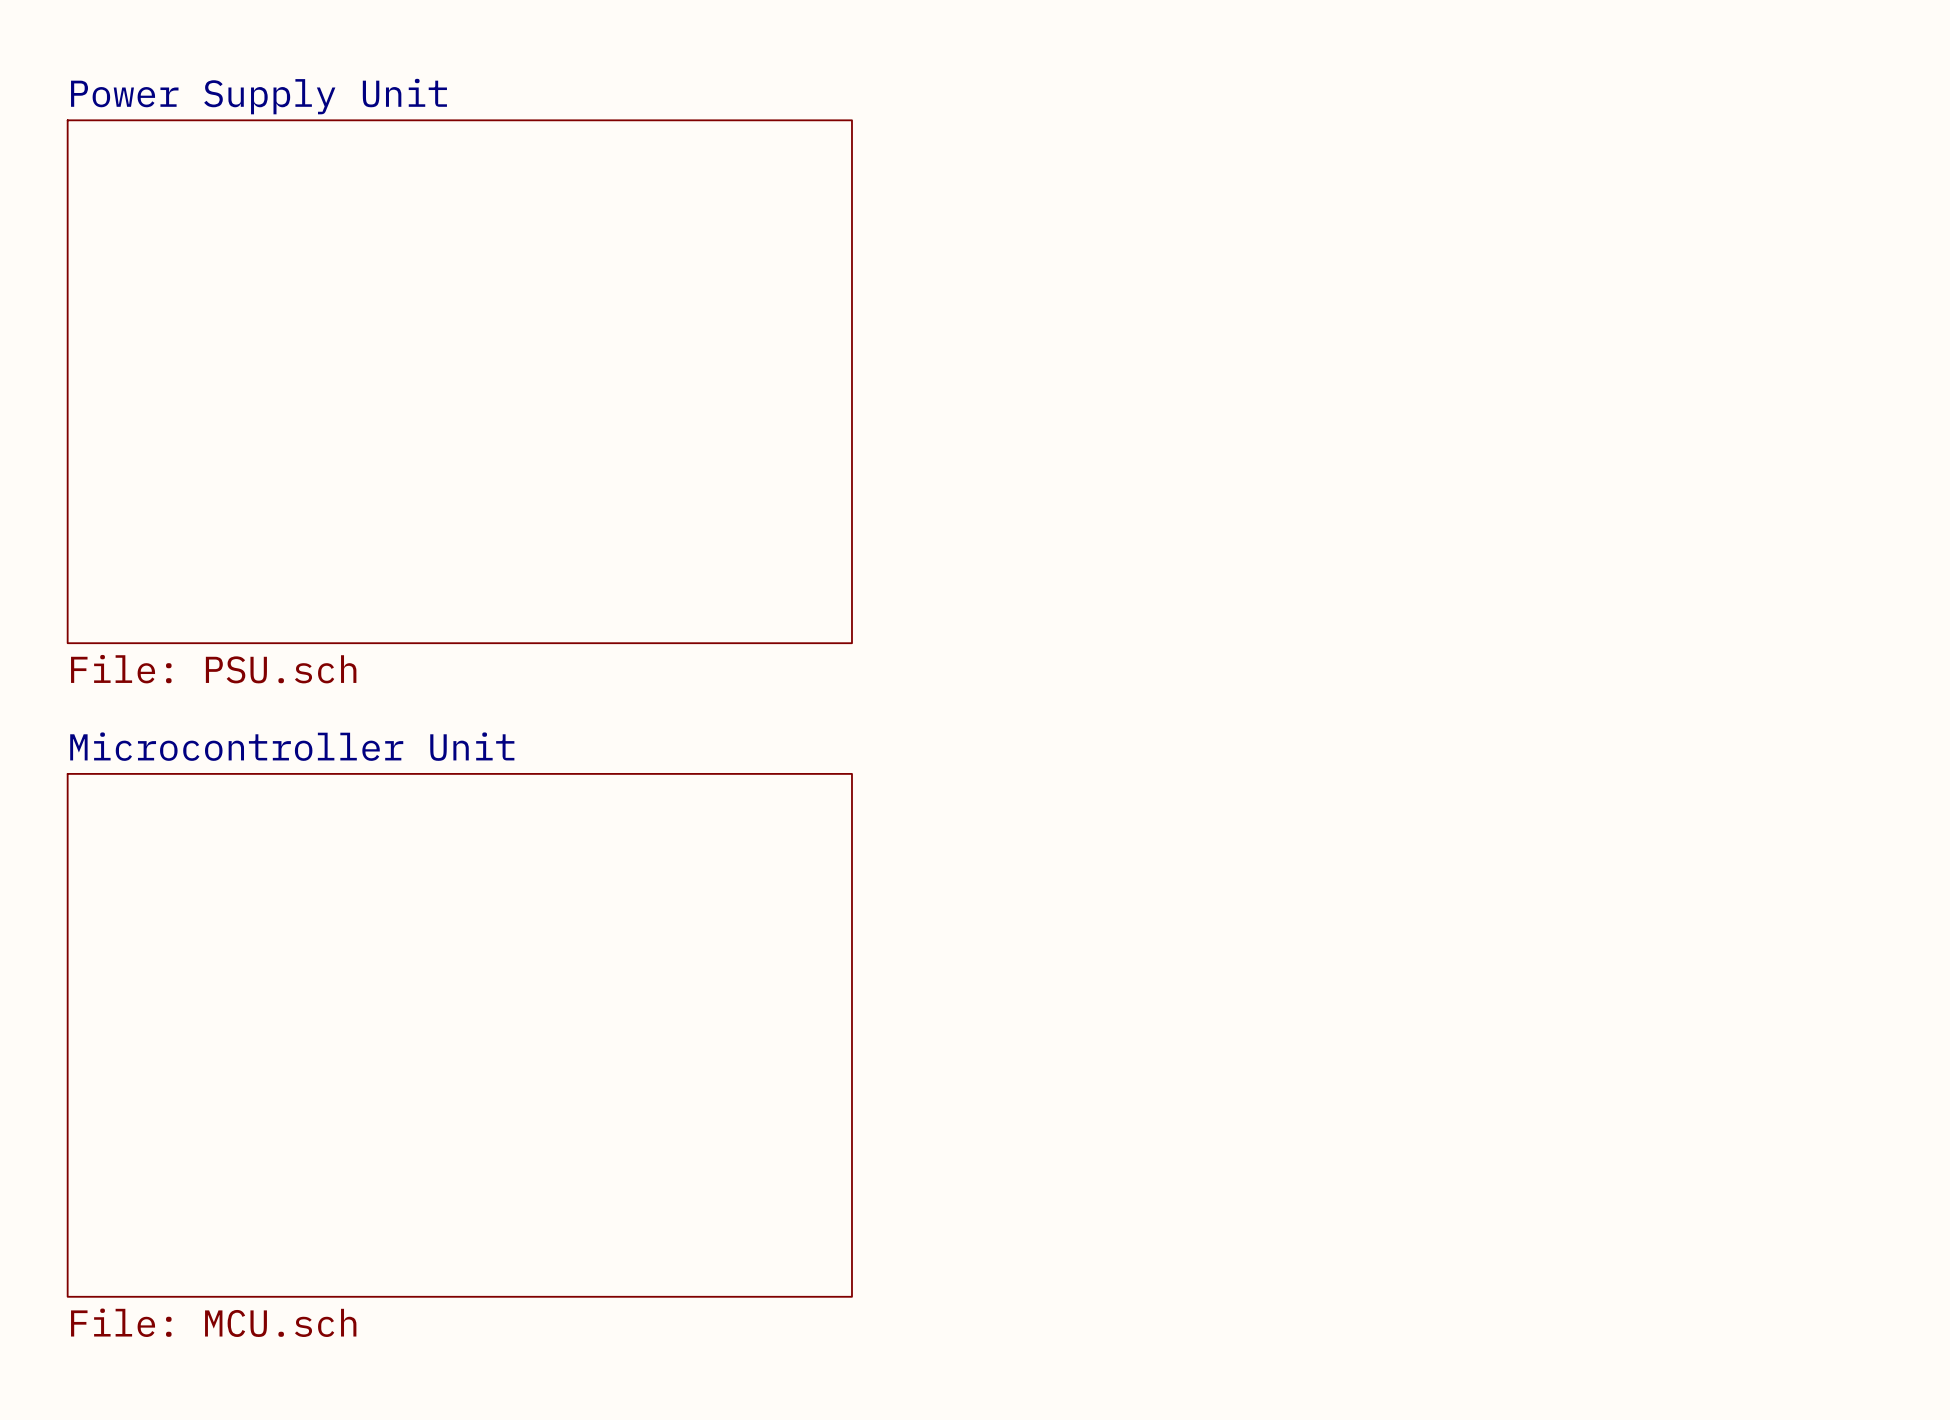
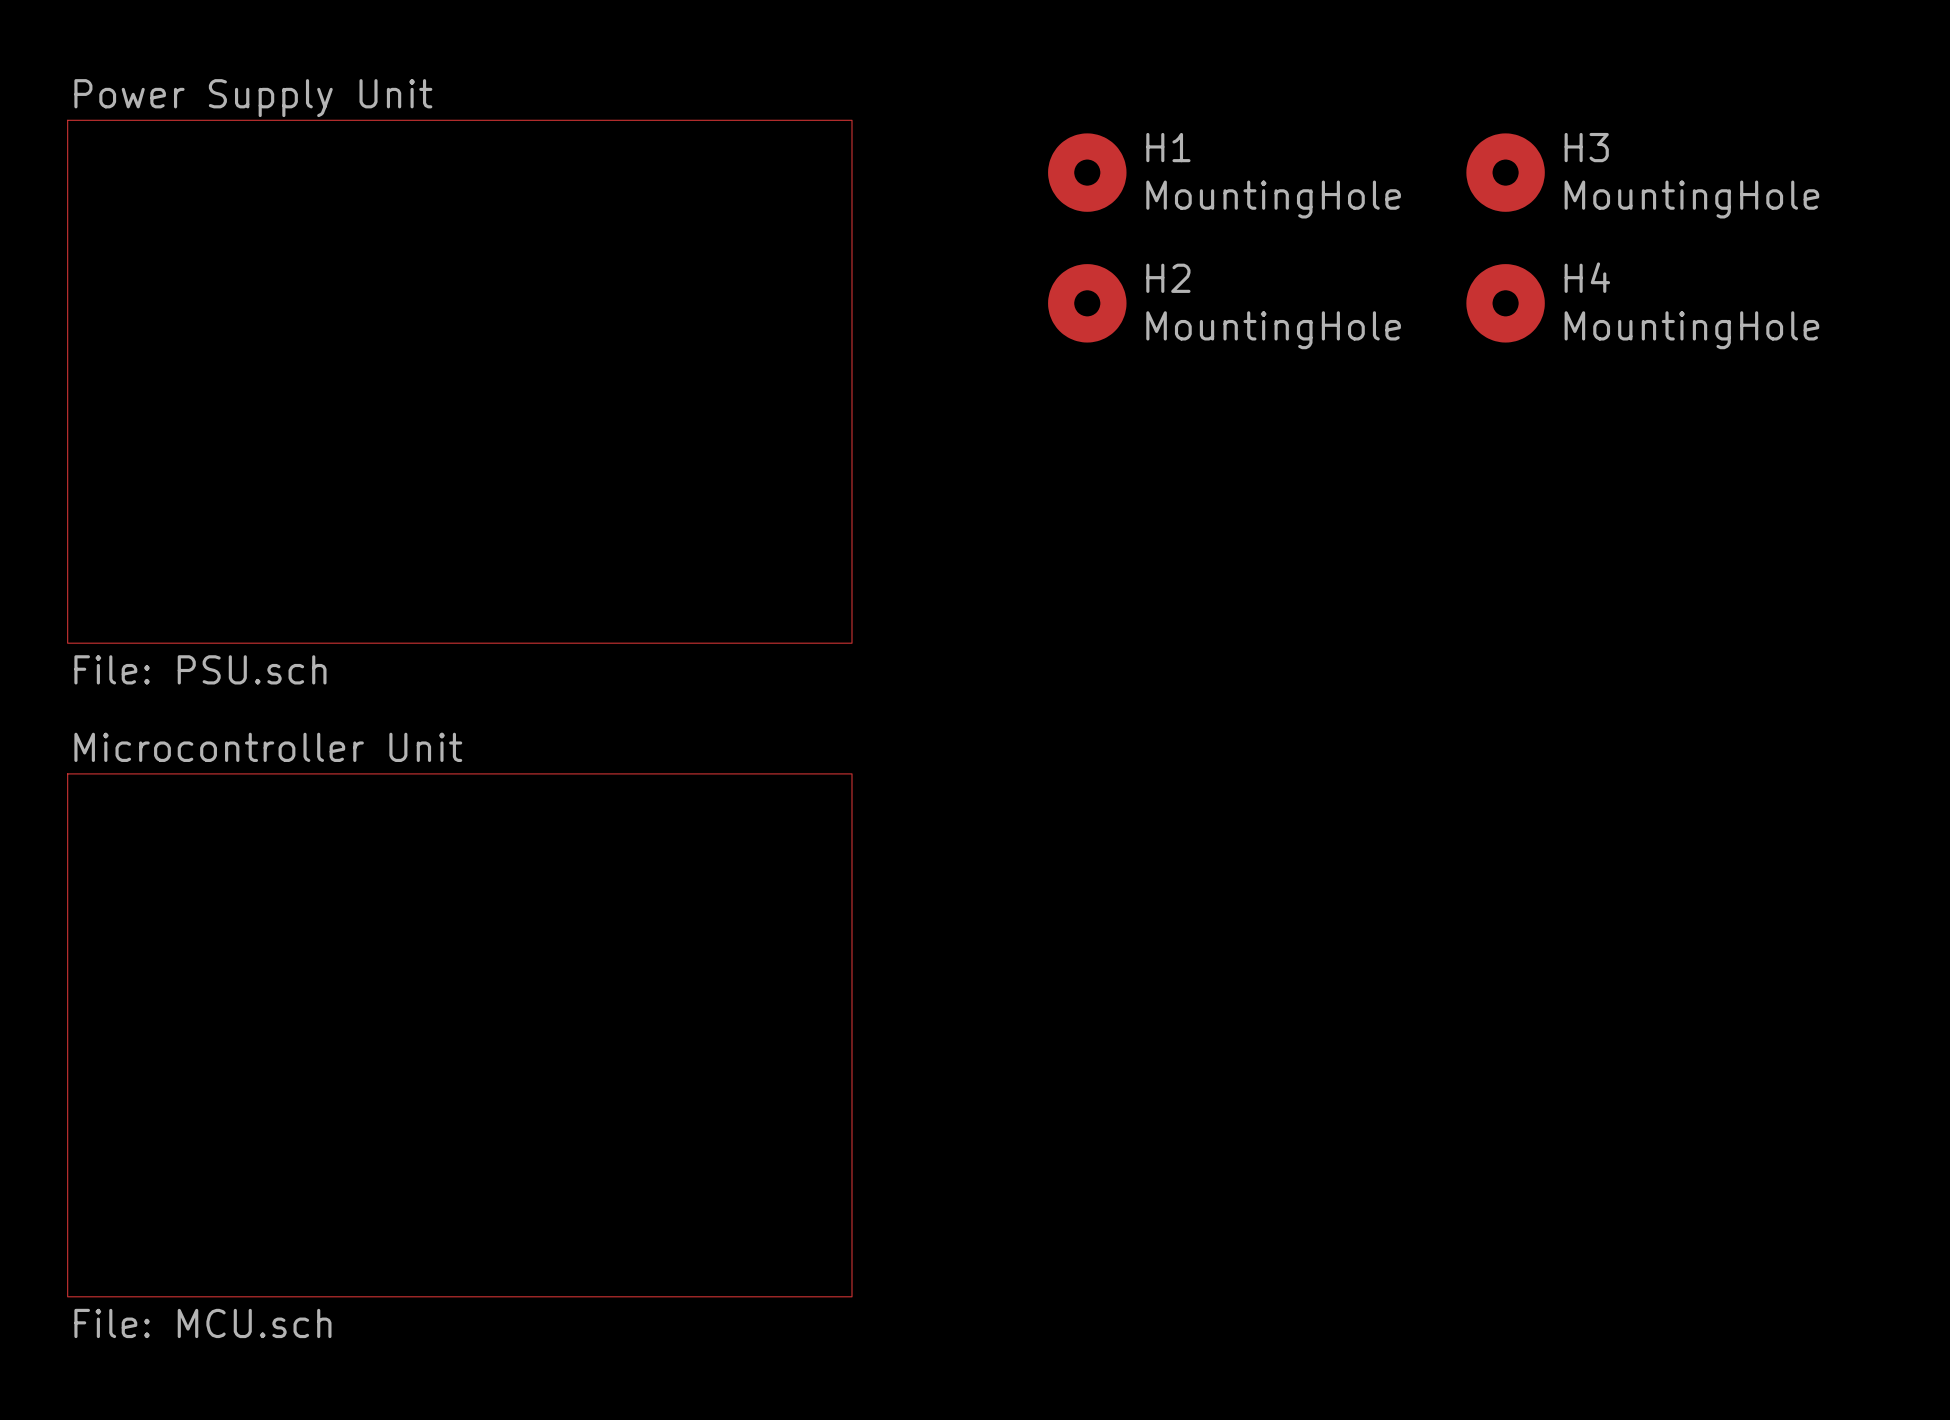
H1: none -> MountingHole (1087, 172)
H3: none -> MountingHole (1505, 172)
H2: none -> MountingHole (1087, 303)
H4: none -> MountingHole (1505, 303)

